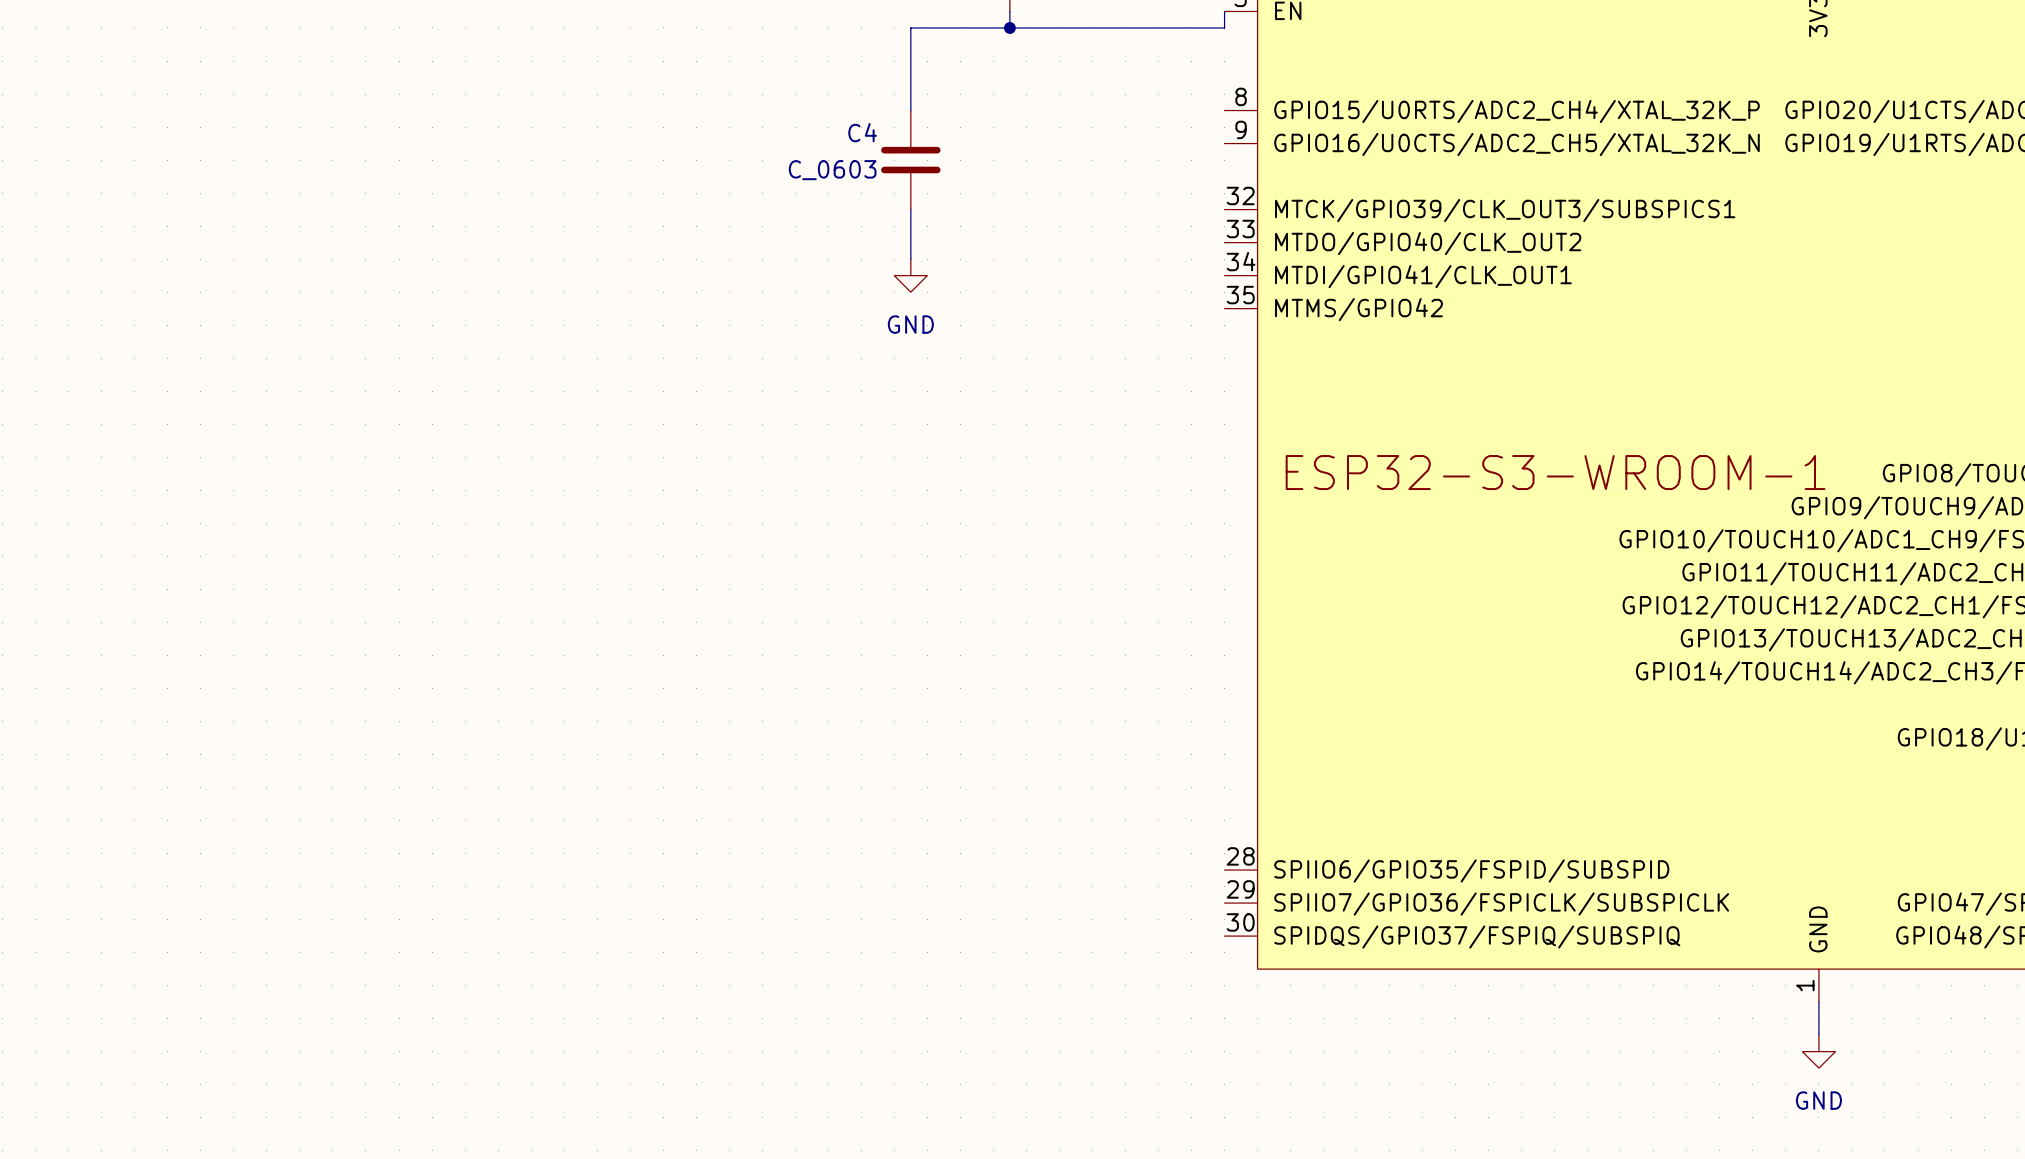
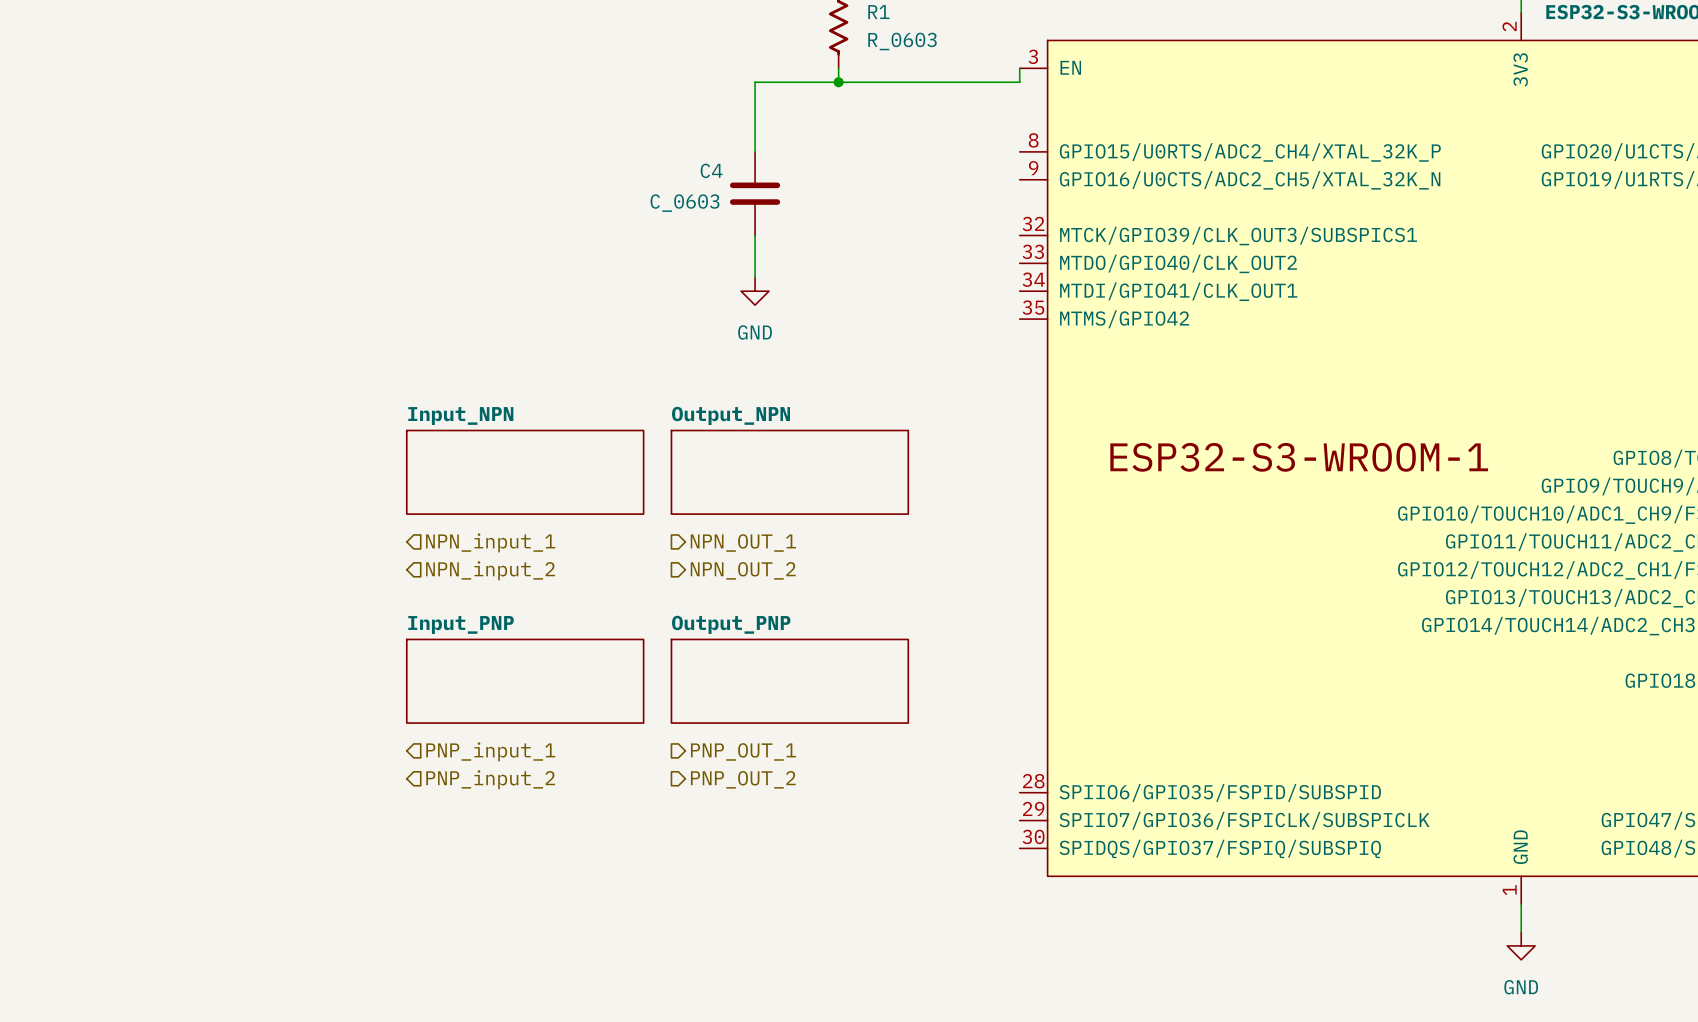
sheet Input_NPN: none -> (525, 472)
sheet Output_NPN: none -> (789, 472)
hierarchical label: none -> NPN_OUT_1 (743, 543)
hierarchical label: none -> NPN_input_1 (490, 542)
hierarchical label: none -> NPN_OUT_2 (743, 570)
hierarchical label: none -> NPN_input_2 (490, 570)
sheet Input_PNP: none -> (525, 681)
sheet Output_PNP: none -> (789, 681)
hierarchical label: none -> PNP_OUT_1 (743, 751)
hierarchical label: none -> PNP_input_1 (490, 751)
hierarchical label: none -> PNP_OUT_2 (743, 779)
hierarchical label: none -> PNP_input_2 (490, 779)

